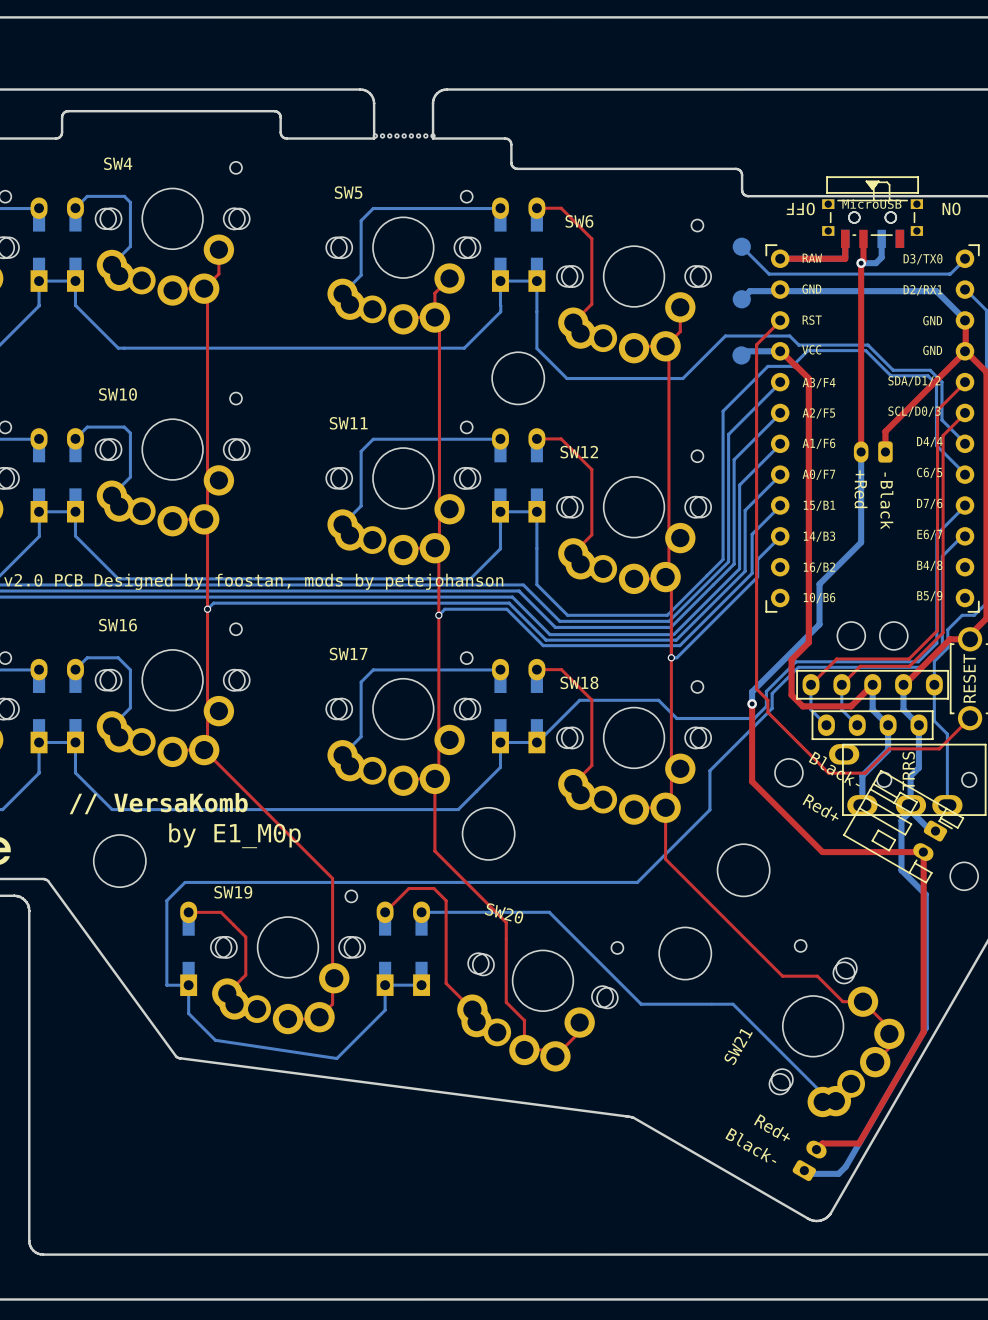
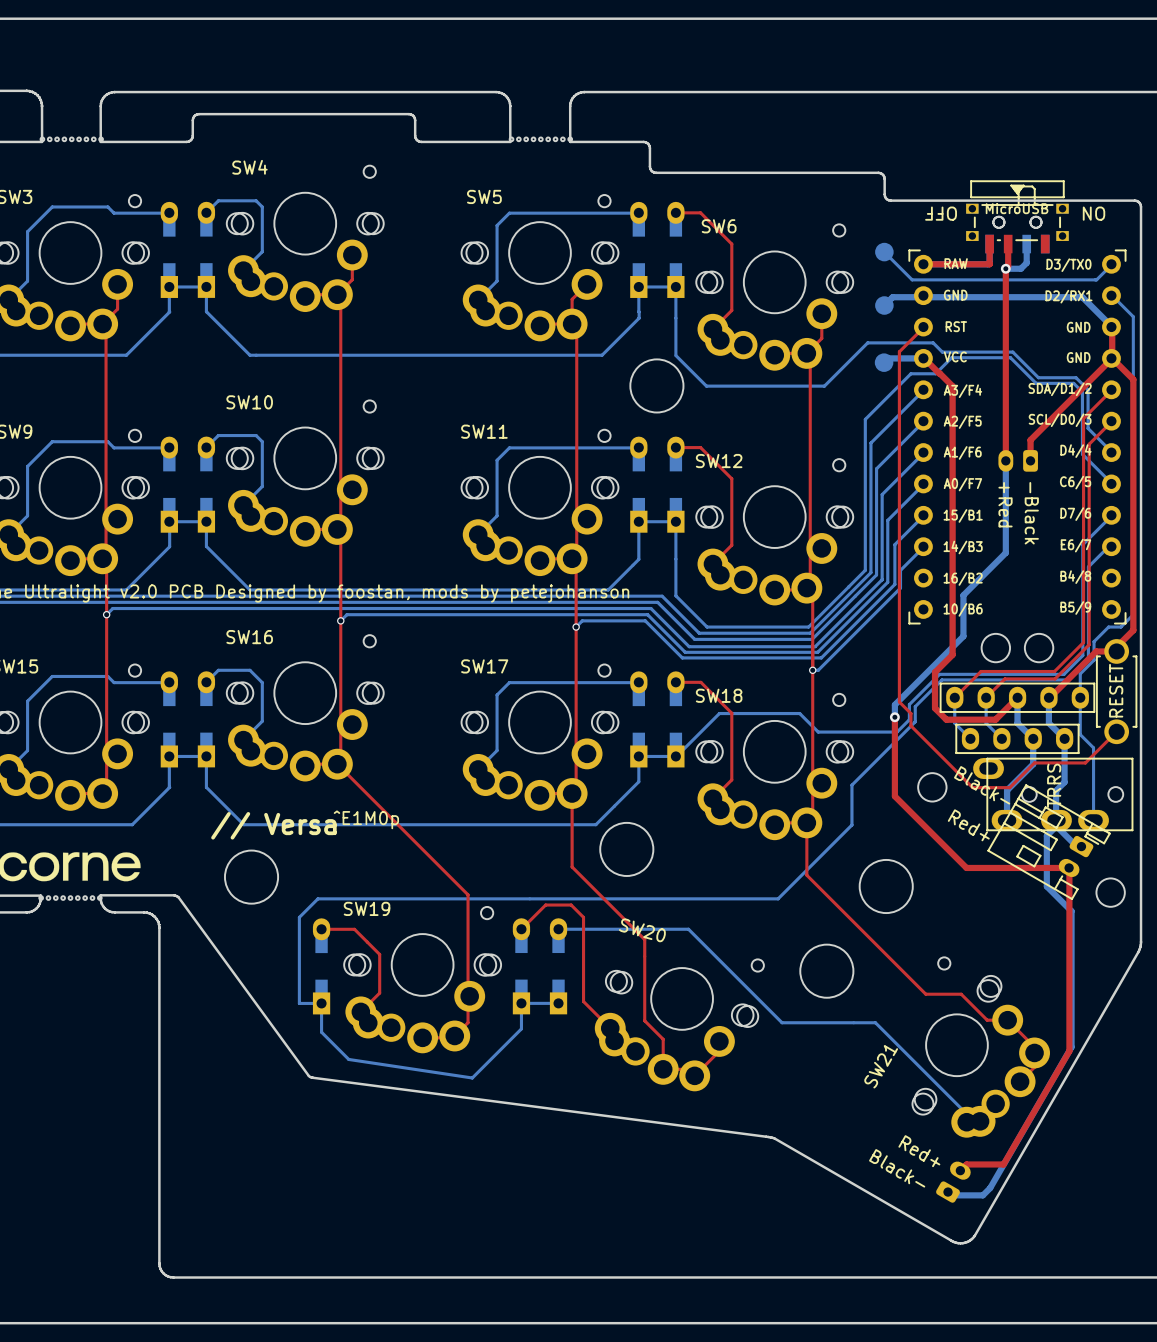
text: // VersaKomb (158, 803) -> // Versa (273, 825)
text: by E1_M0p (234, 835) -> ^E1M0p (366, 819)

